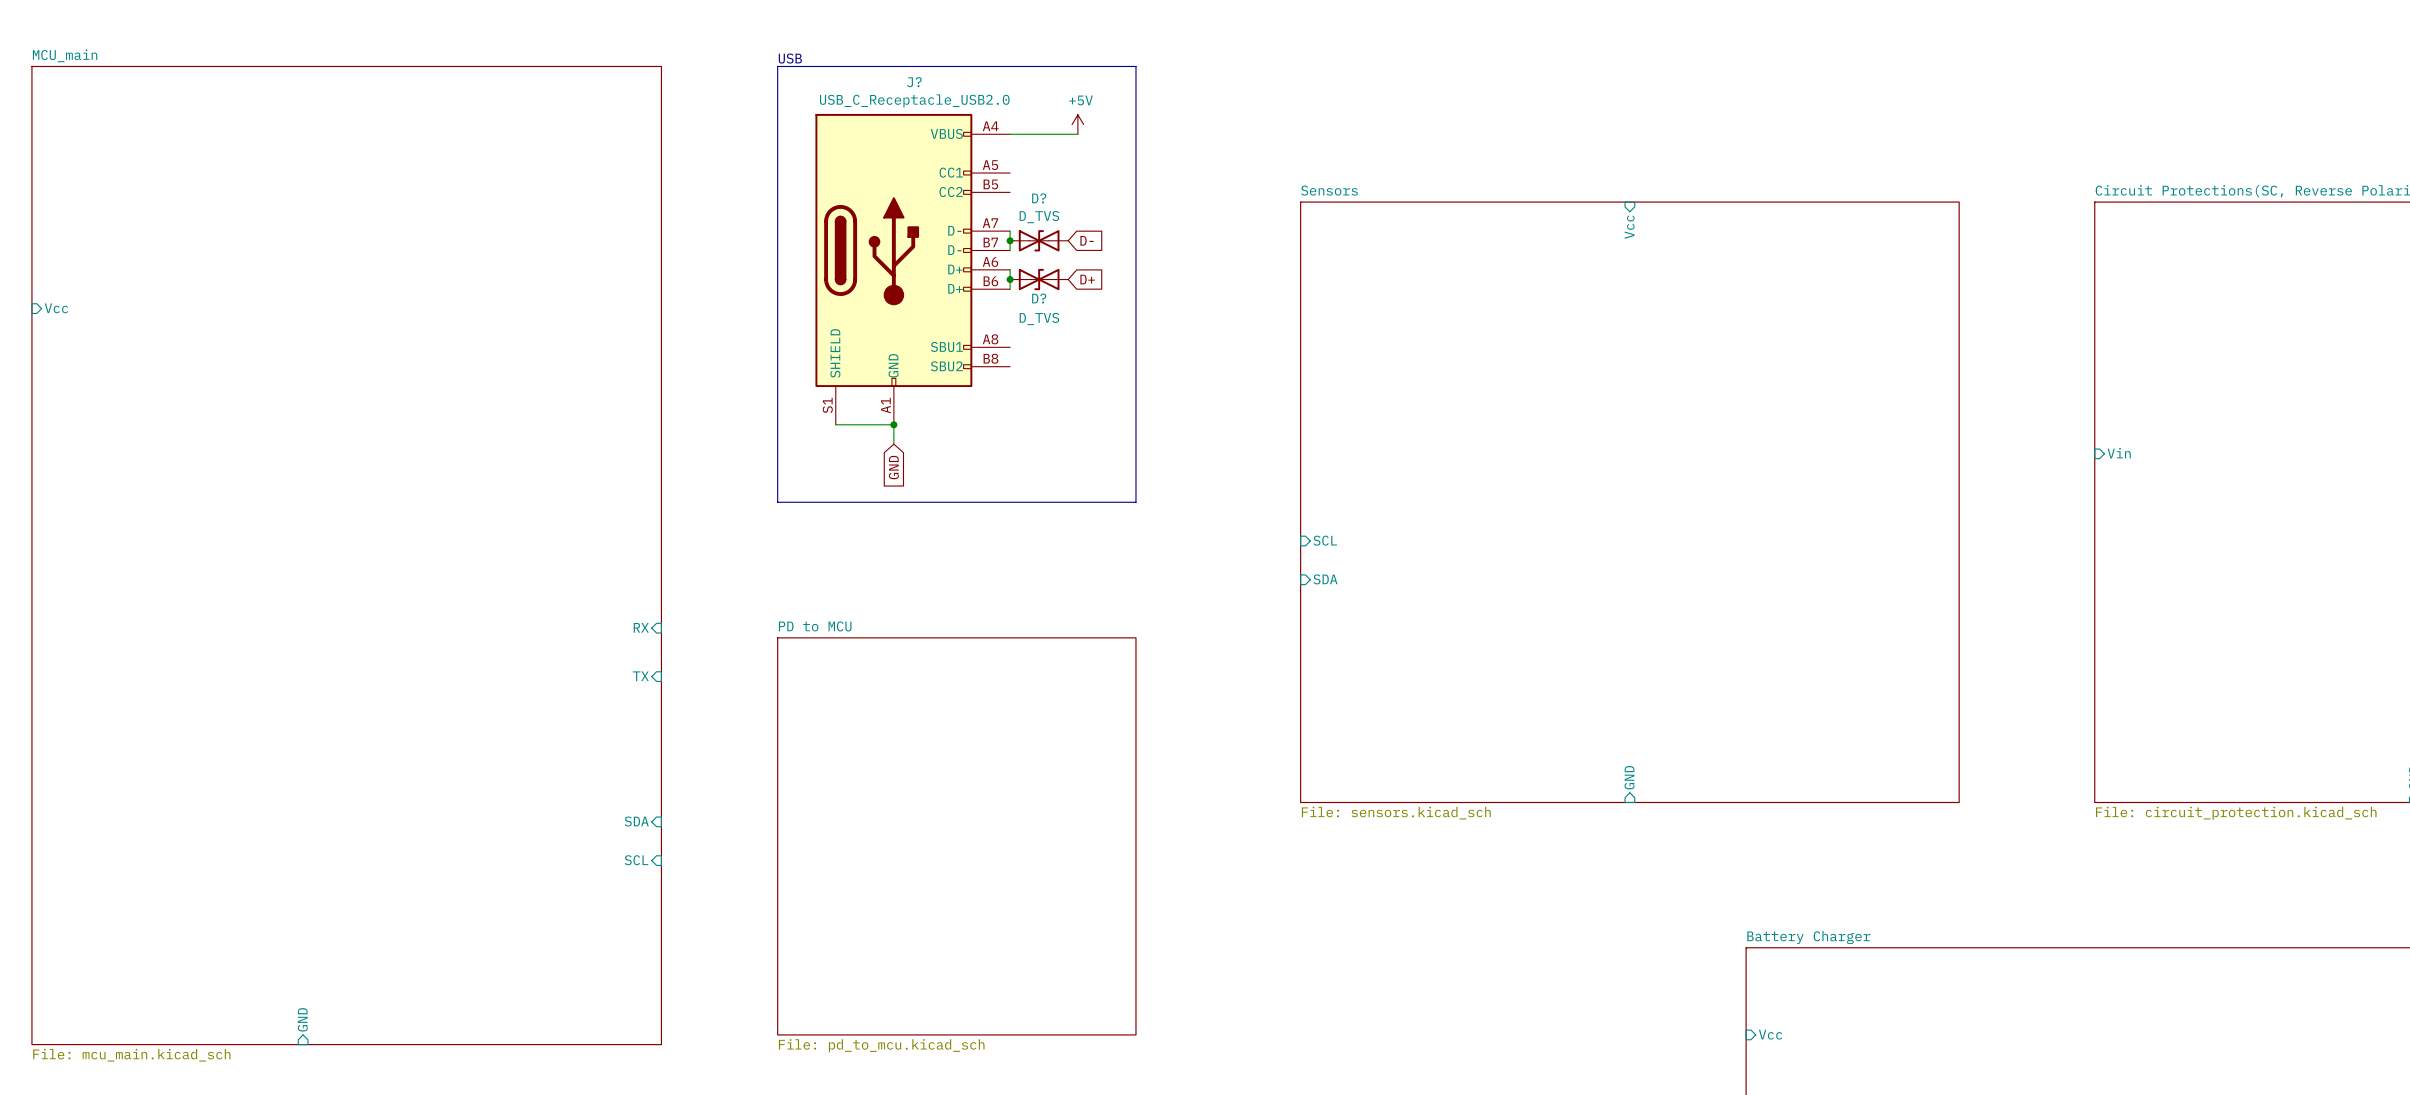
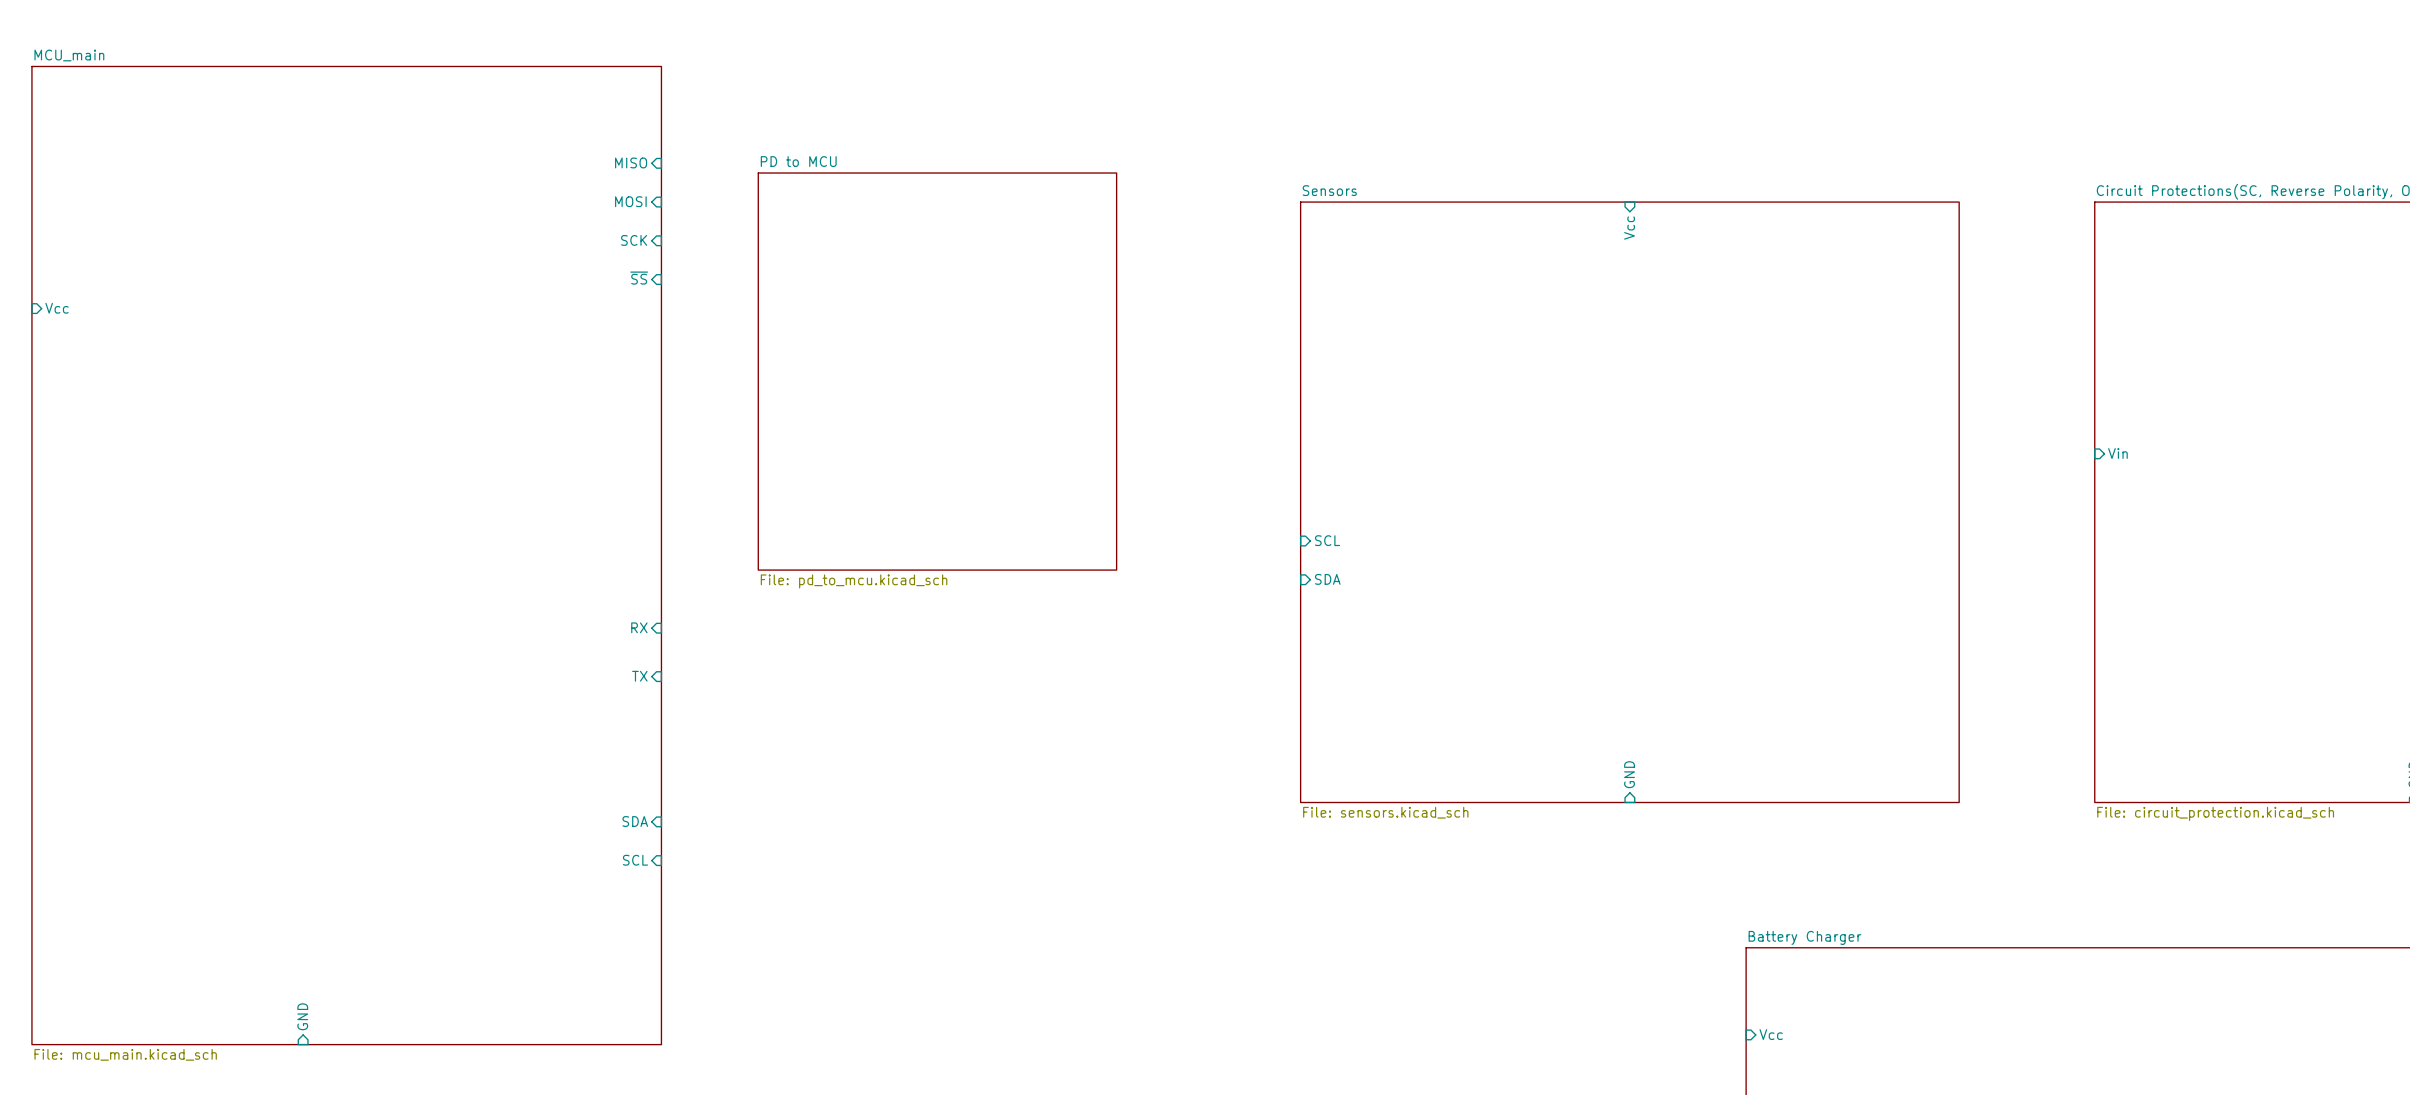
text: USB (790, 58) -> none
line: (777, 66) (777, 502) (1135, 502) (1135, 66) (777, 66) -> none
power symbol: +5V (1077, 124) -> none
wire: (1010, 134) (1077, 134) -> none
sheet pin: none -> MISO (631, 162)
sheet pin: none -> MOSI (630, 201)
wire: (1010, 231) (1010, 250) -> none
sheet pin: none -> SCK (634, 240)
junction: (1010, 240) -> none
D?: D_TVS (1039, 240) -> none
global label: D- (1087, 240) -> none
J?: USB_C_Receptacle_USB2.0 (912, 269) -> none
wire: (1010, 269) (1010, 289) -> none
sheet pin: none -> ~{SS} (639, 278)
junction: (1010, 279) -> none
D?: D_TVS (1039, 279) -> none
global label: D+ (1087, 279) -> none
sheet PD to MCU: none -> File: pd_to_mcu.kicad_sch (937, 371)
wire: (835, 424) (893, 424) (893, 444) -> none
junction: (893, 424) -> none
global label: GND (893, 467) -> none
sheet PD to MCU: File: pd_to_mcu.kicad_sch (956, 836) -> none

